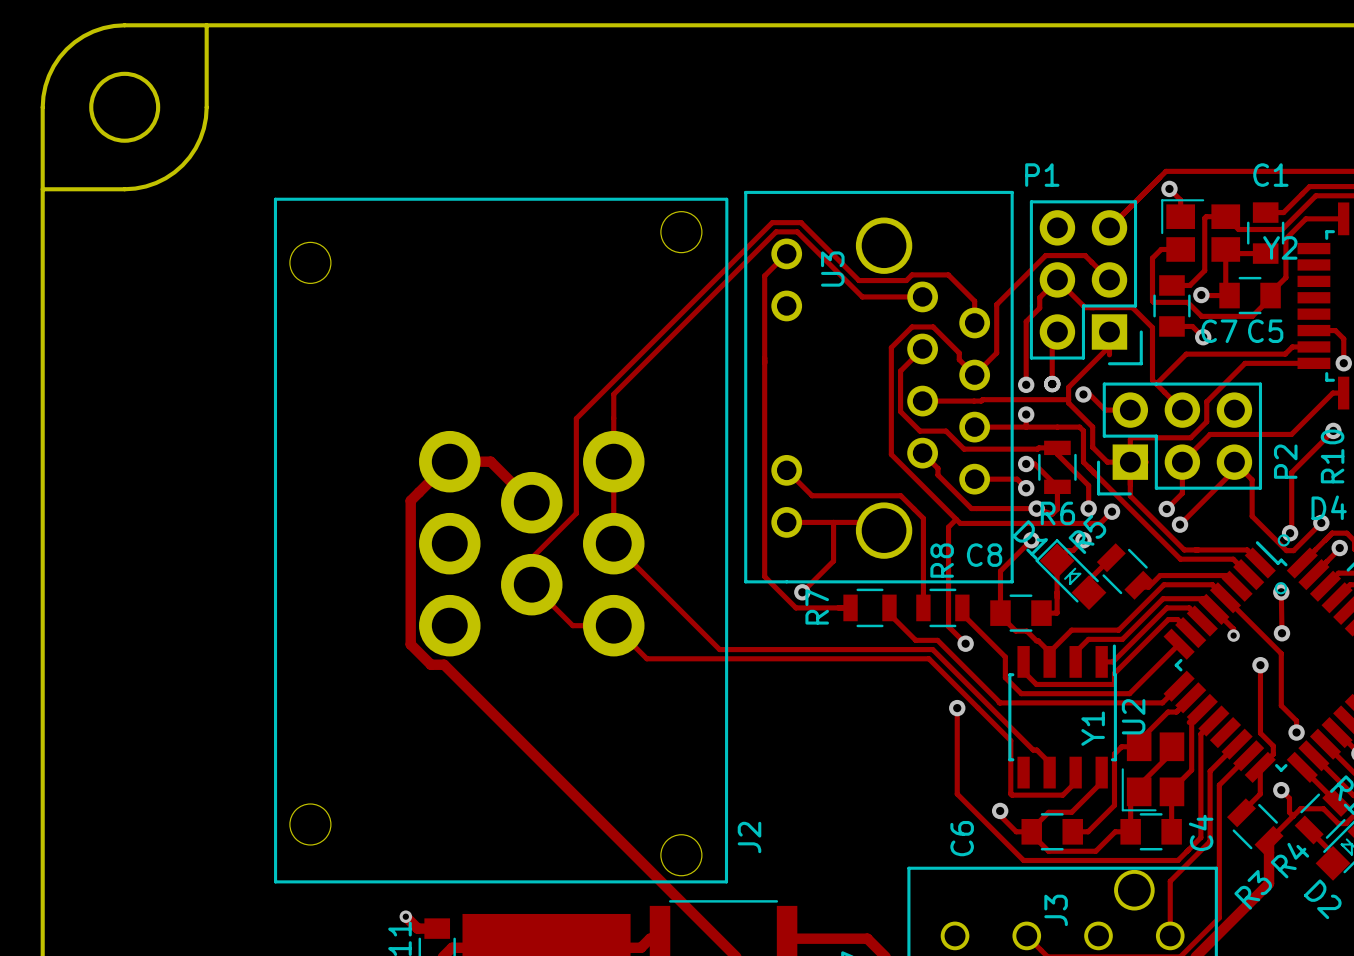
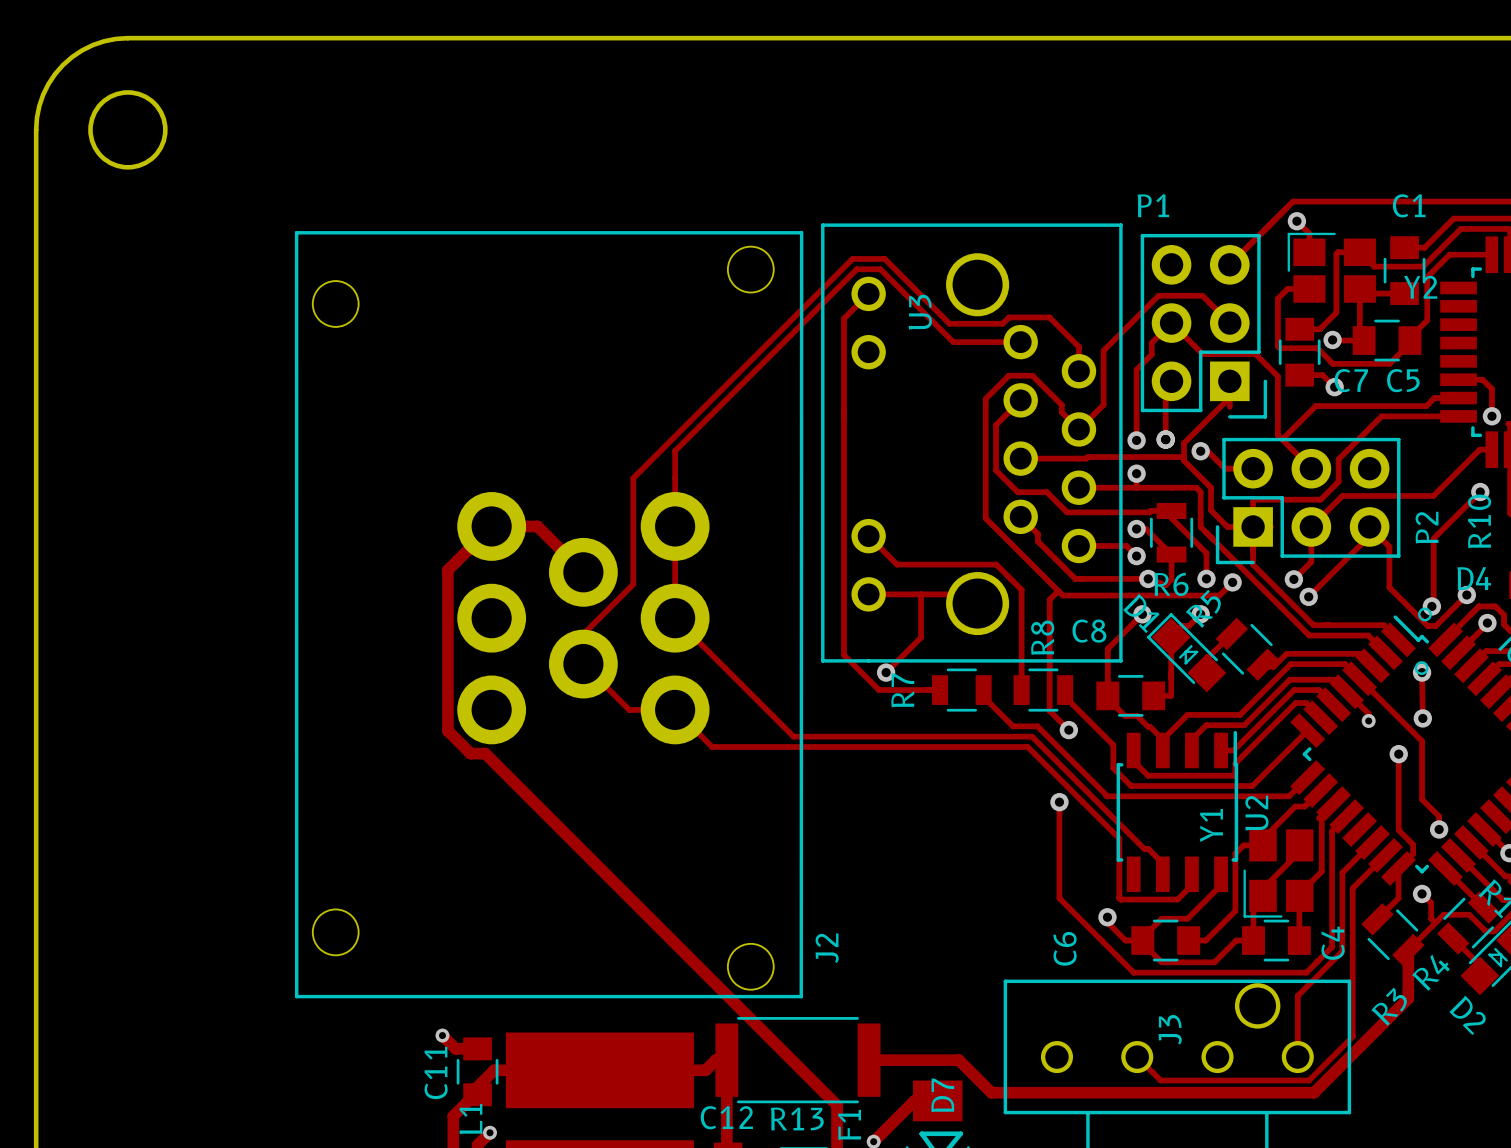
board edge: (206, 25) (205, 117) (200, 138) (182, 165) (156, 183) (135, 188) (42, 189) -> none

